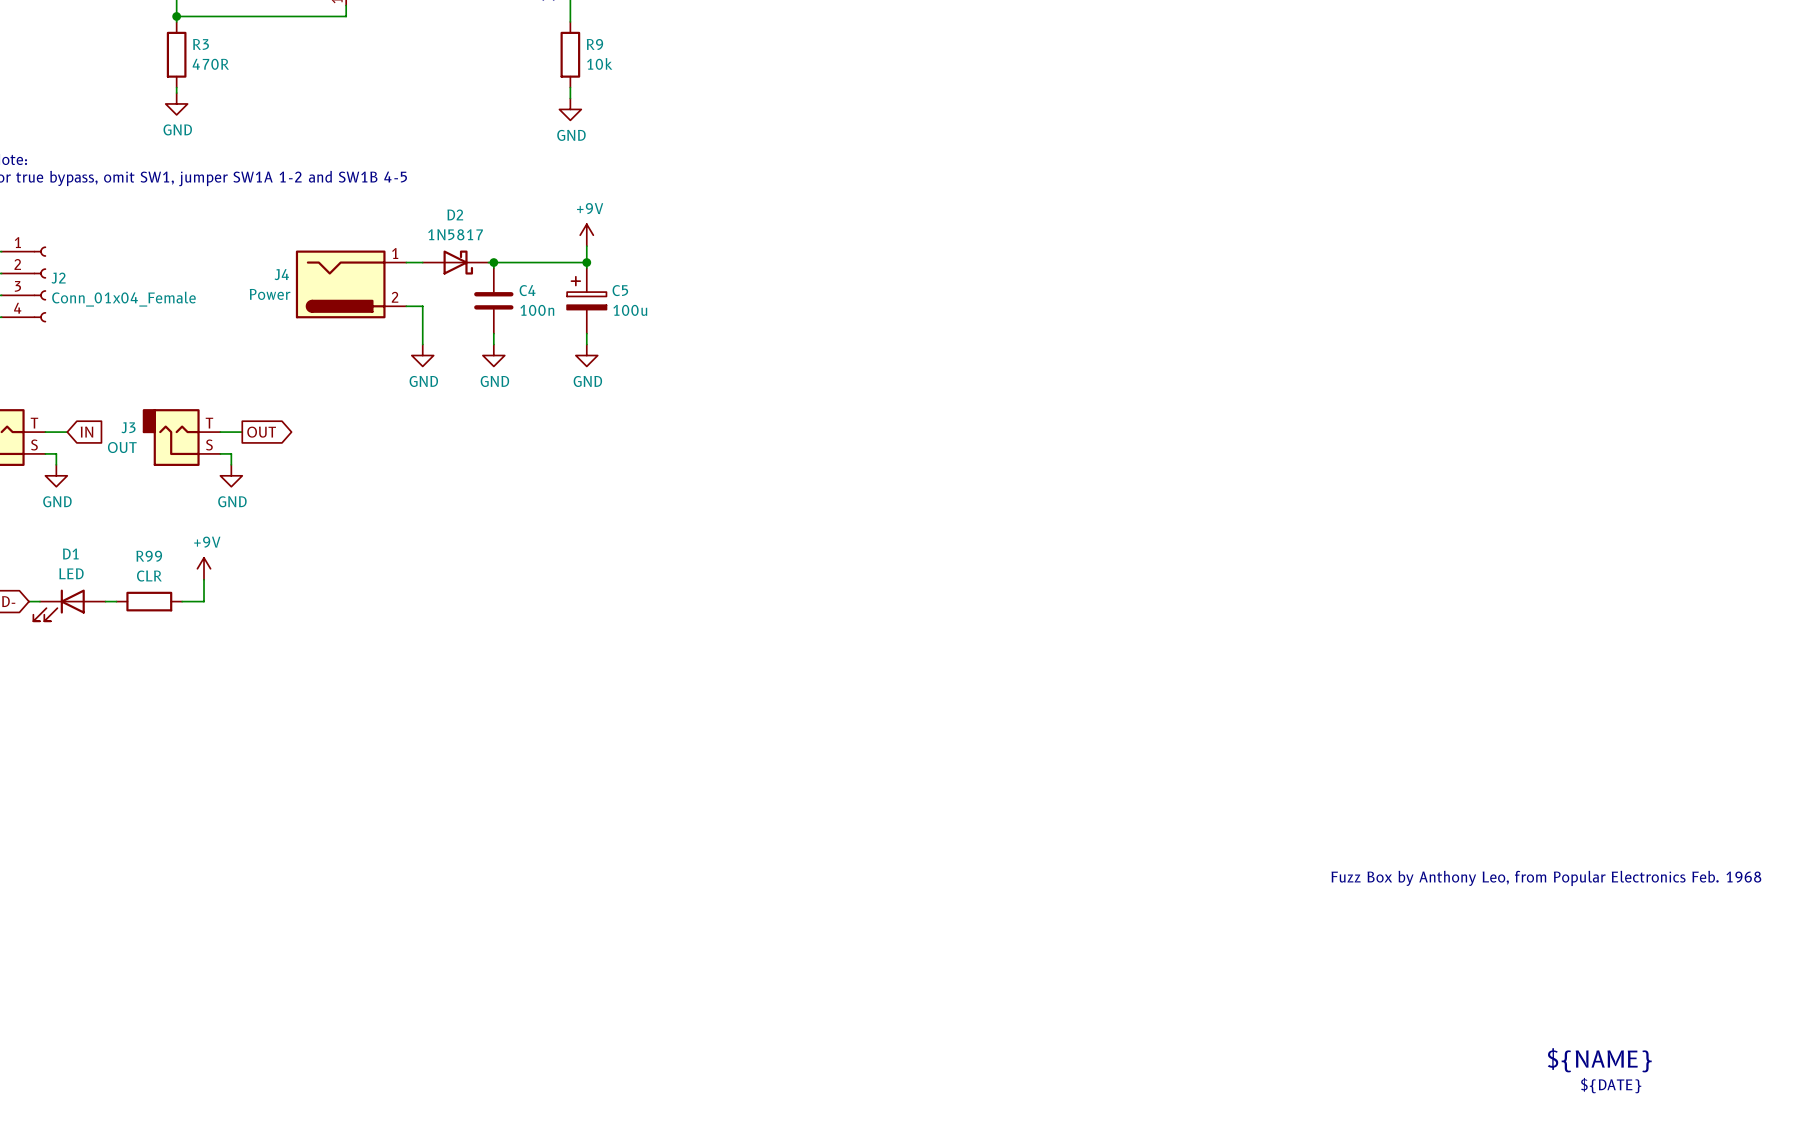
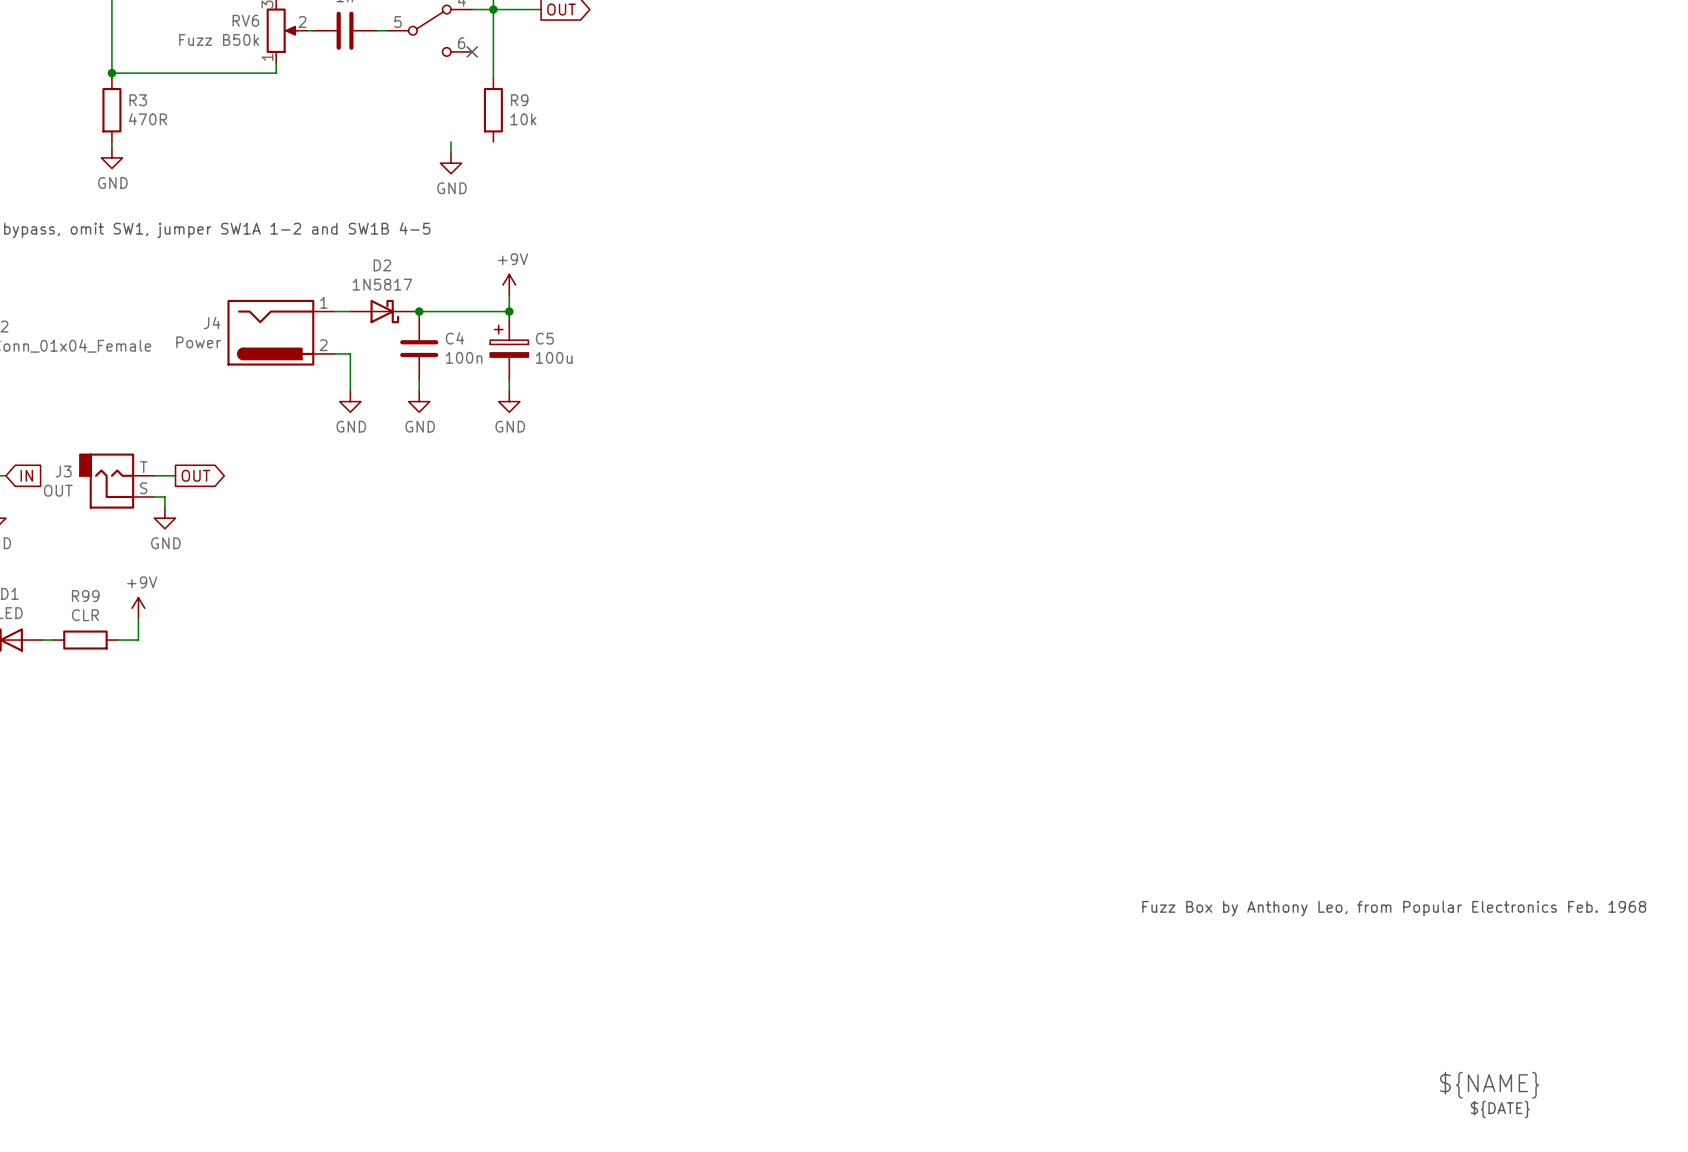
wire: (570, 87) (570, 98) -> (451, 142) (451, 152)
power symbol position: GND (570, 109) -> GND (451, 163)

